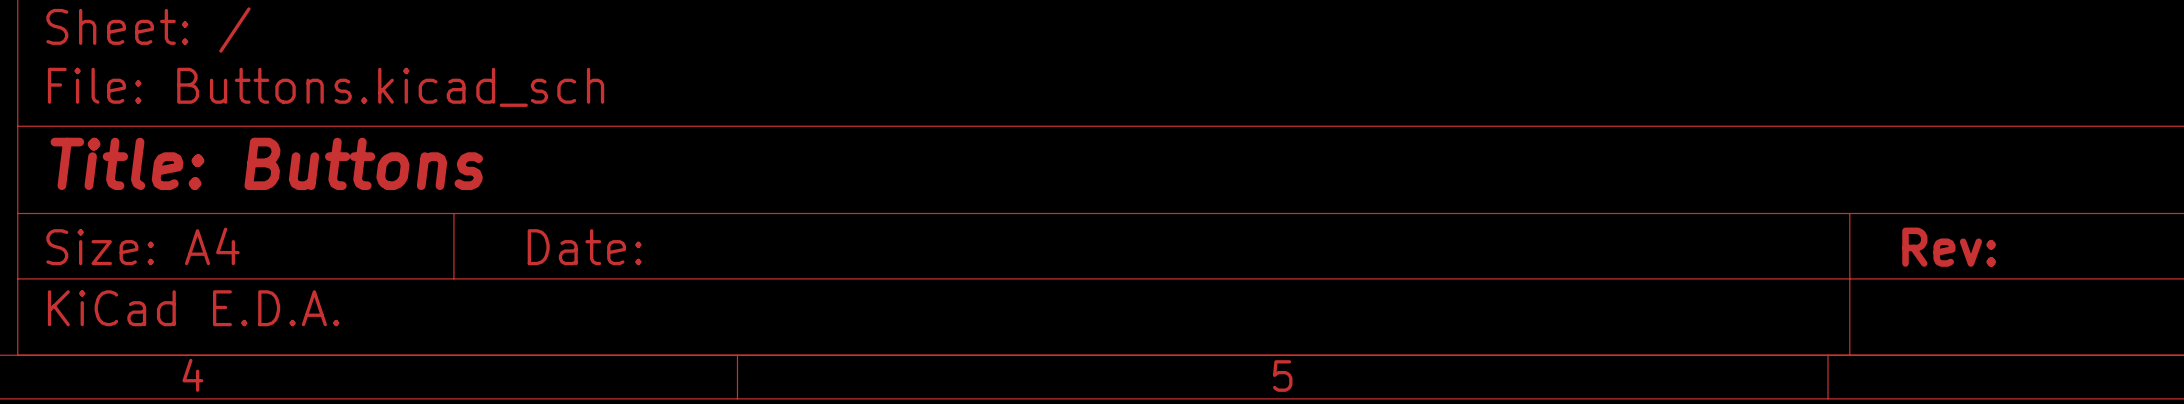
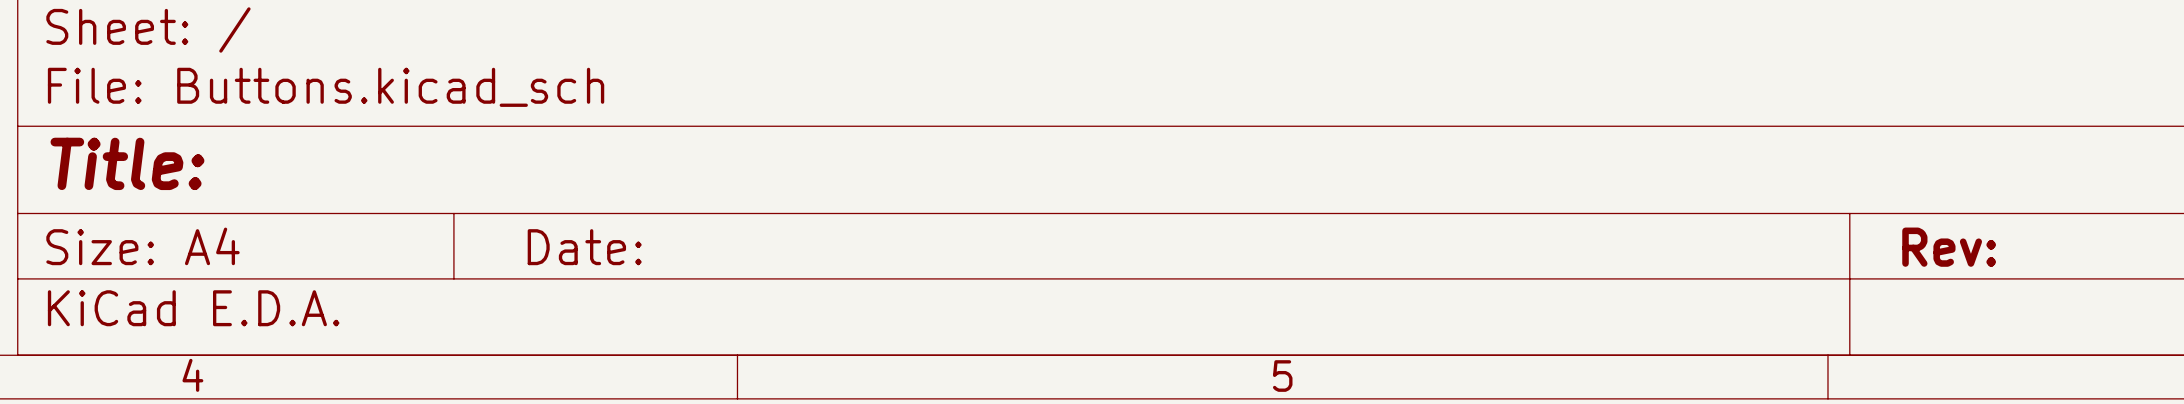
title block: Title: Buttons (266, 163) -> Title: (127, 163)

